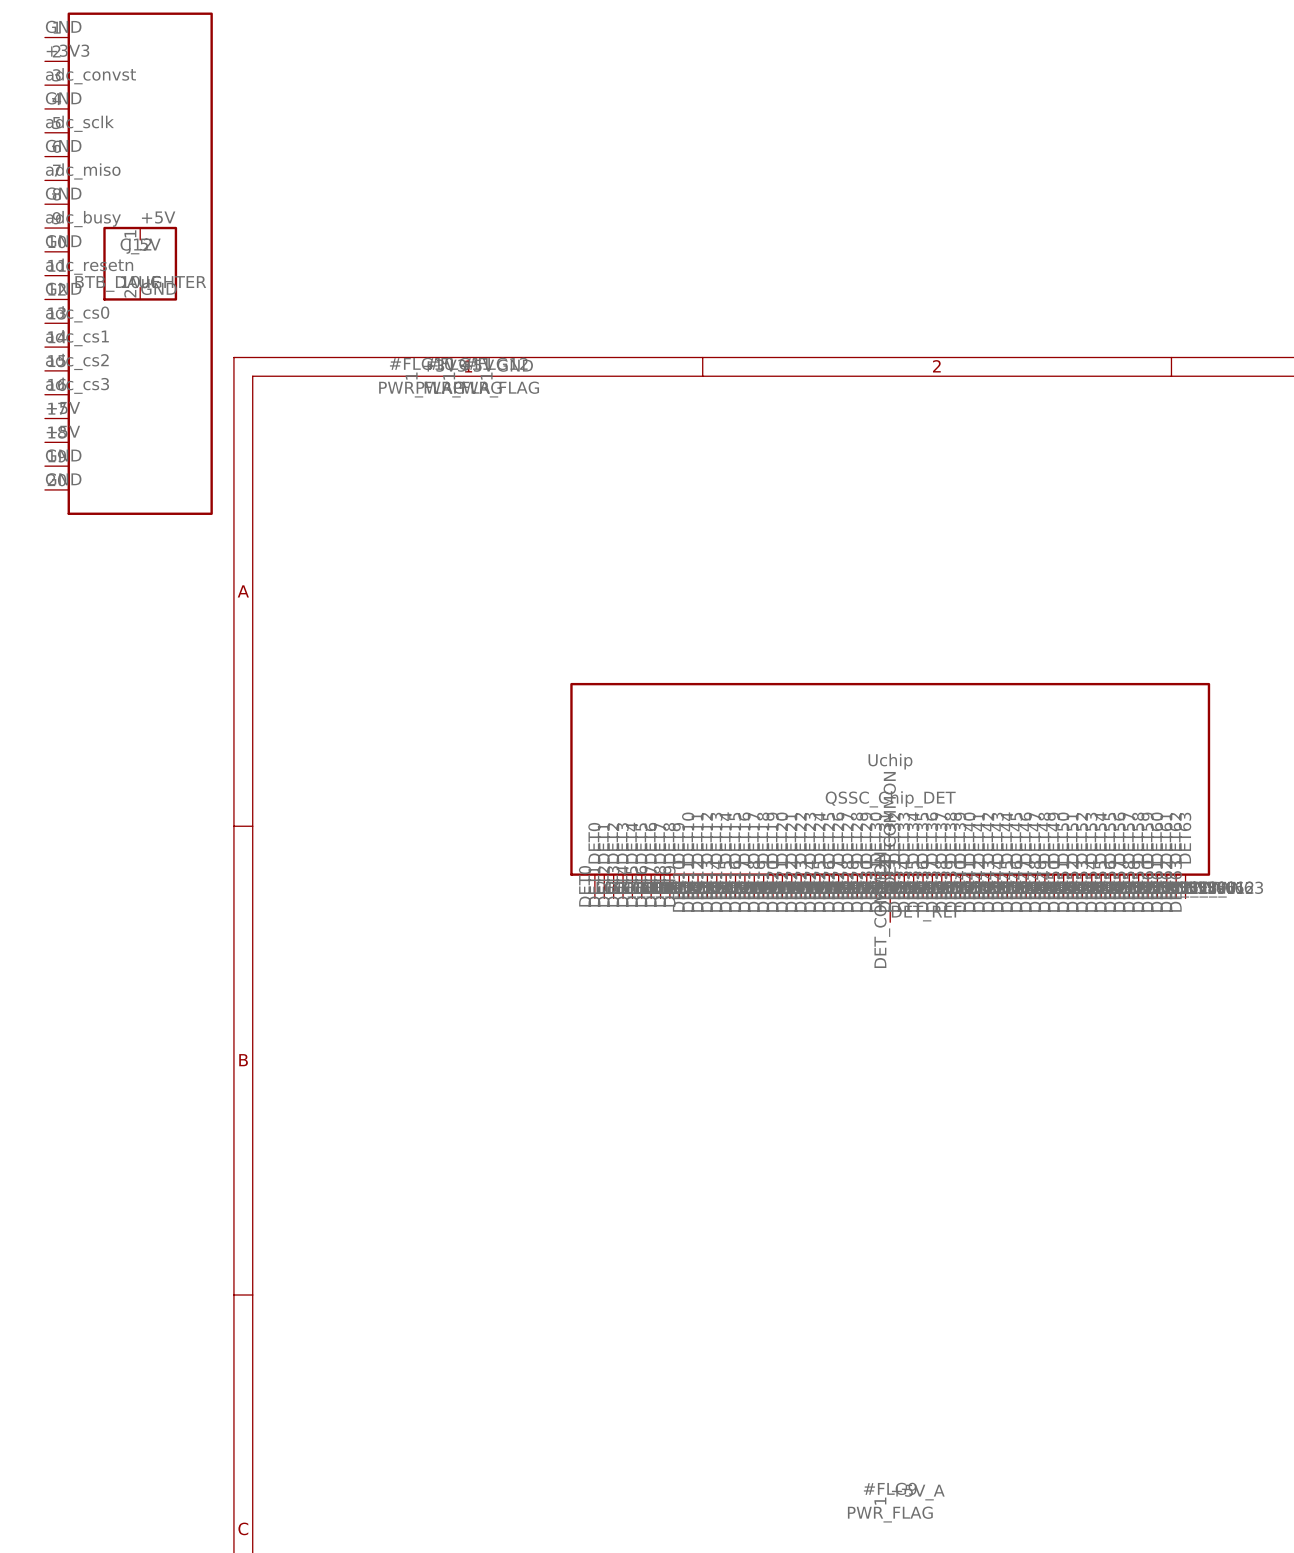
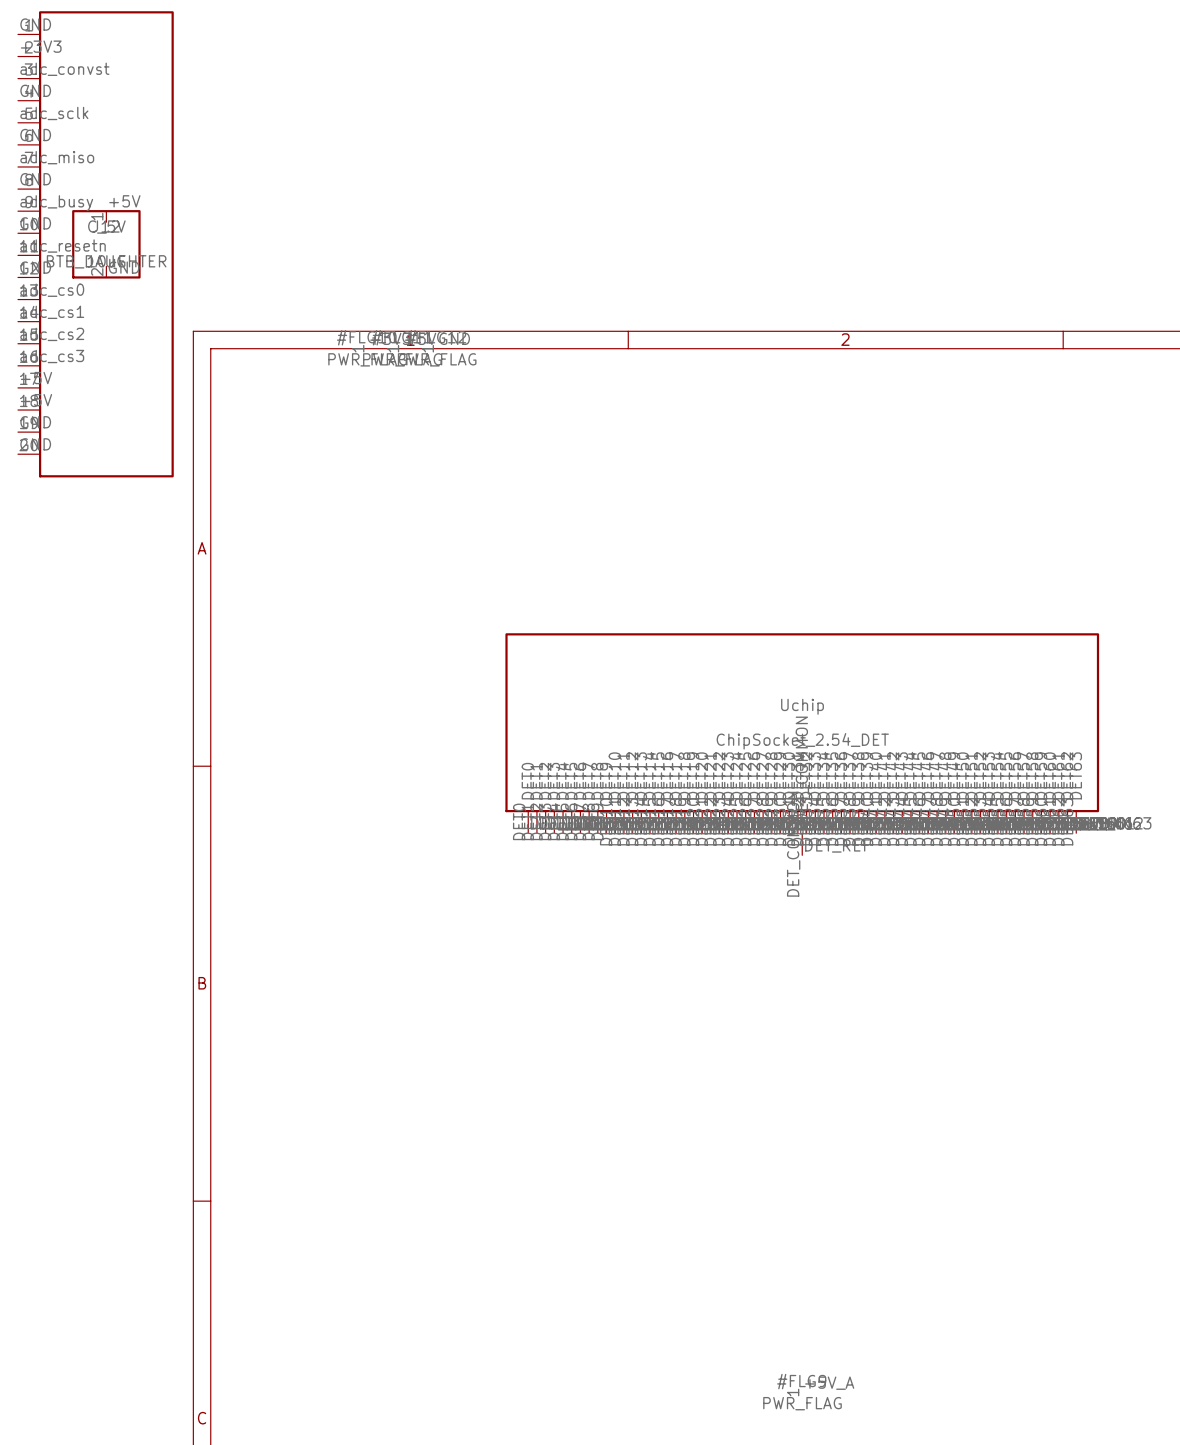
Uchip value: QSSC_Chip_DET (890, 799) -> ChipSocket_2.54_DET (802, 741)

